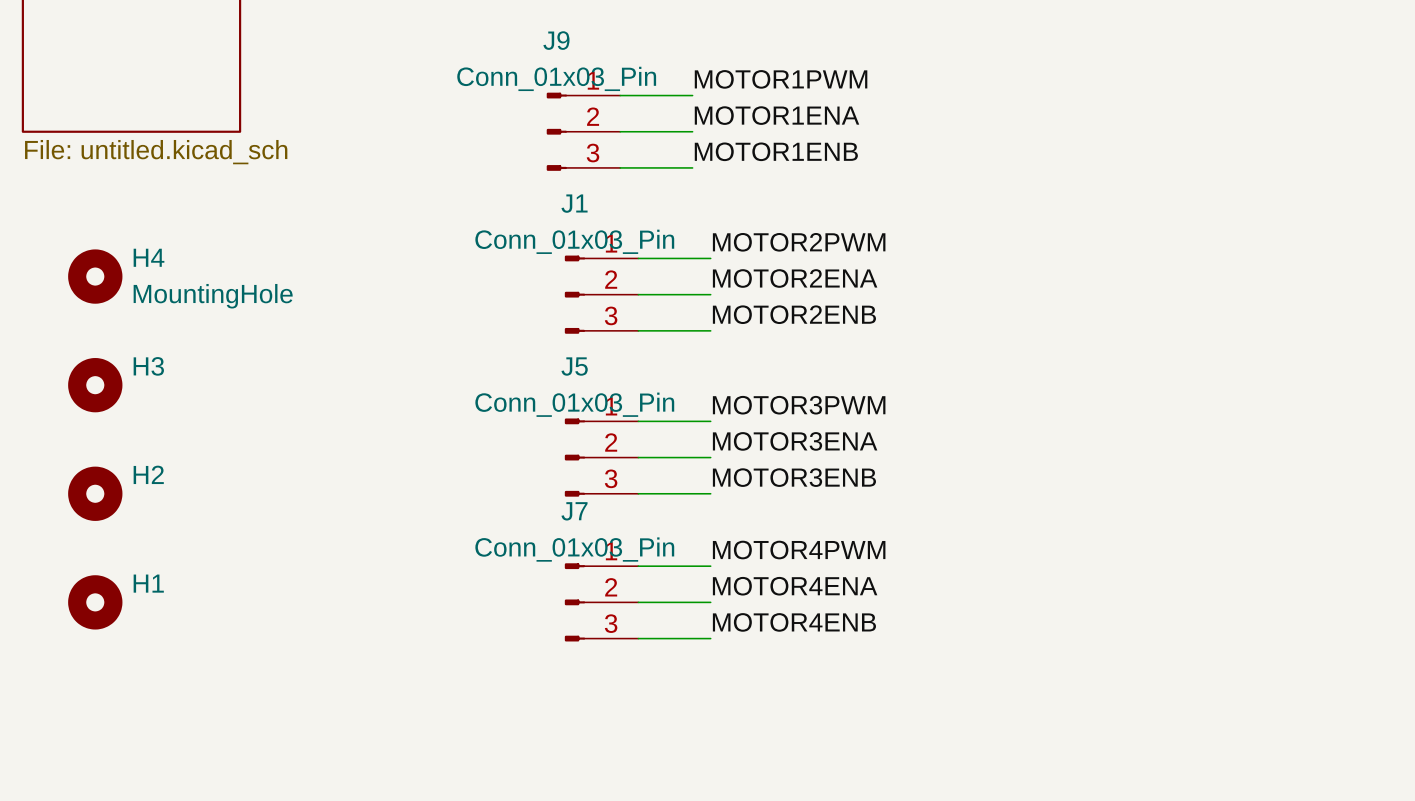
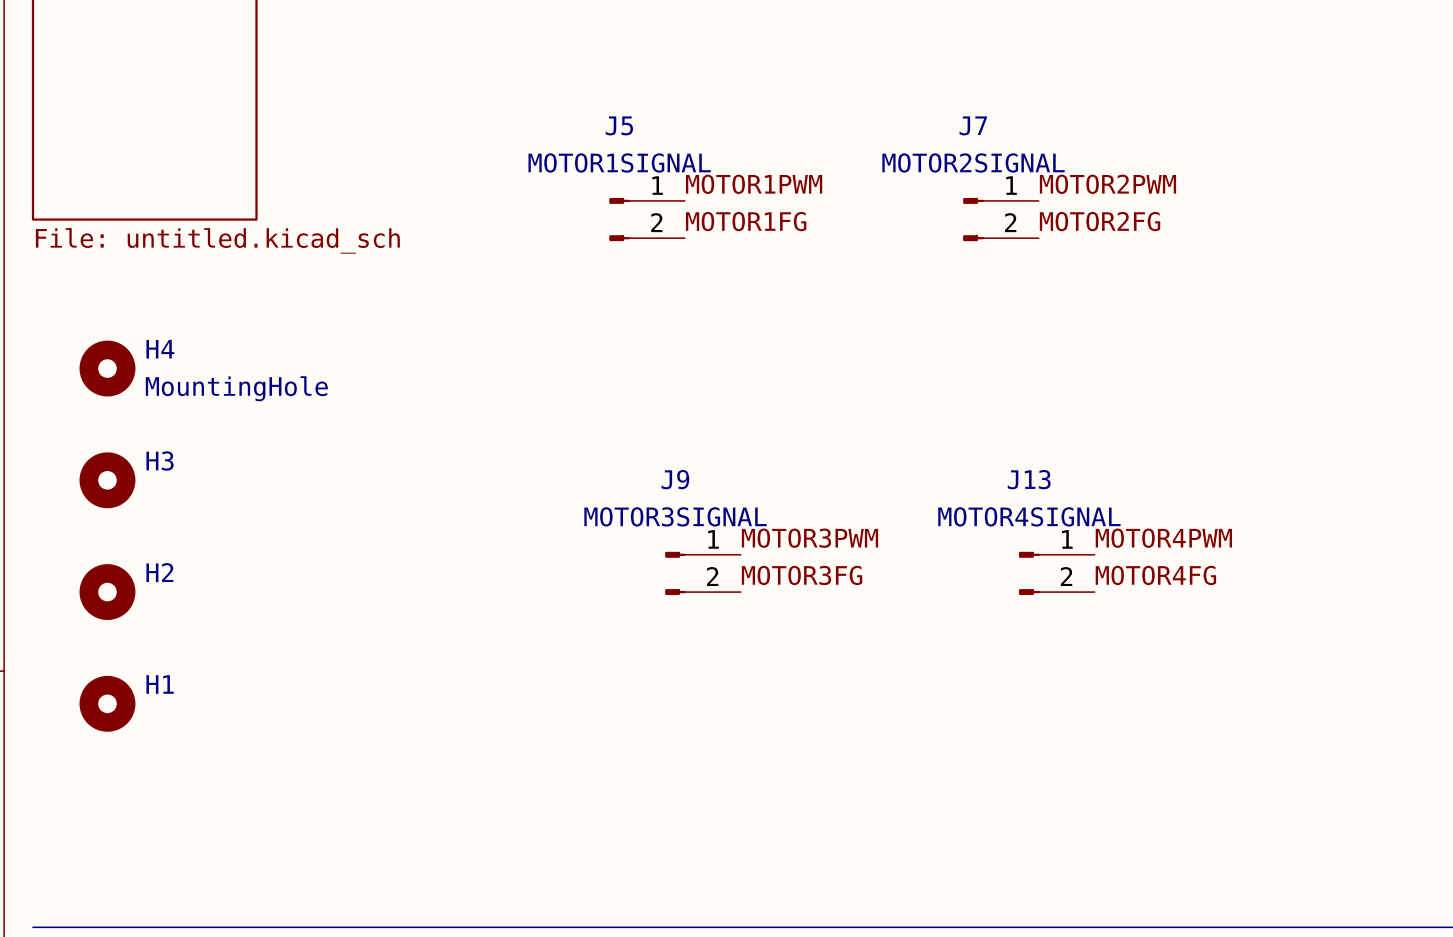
J9 value: Conn_01x03_Pin (556, 78) -> MOTOR3SIGNAL (675, 516)
label position: MOTOR1PWM (781, 79) -> MOTOR1PWM (754, 184)
J9 symbol: [546, 92, 621, 171] -> [665, 551, 741, 596]
wire: (620, 95) (692, 95) -> none
label: MOTOR1ENA (777, 115) -> none
wire: (620, 131) (692, 131) -> none
label: none -> MOTOR1FG (746, 221)
label: none -> MOTOR2FG (1100, 221)
label: MOTOR1ENB (776, 151) -> none
wire: (620, 167) (692, 167) -> none
label position: MOTOR2PWM (799, 242) -> MOTOR2PWM (1107, 184)
wire: (638, 258) (710, 258) -> none
label: MOTOR2ENA (795, 278) -> none
J1: Conn_01x03_Pin (601, 294) -> none
wire: (638, 294) (710, 294) -> none
label: MOTOR2ENB (794, 314) -> none
wire: (638, 330) (710, 330) -> none
J5 value: Conn_01x03_Pin (574, 404) -> MOTOR1SIGNAL (619, 162)
label: MOTOR3PWM (799, 405) -> none
J5 symbol: [564, 418, 639, 497] -> [609, 197, 685, 242]
wire: (638, 421) (710, 421) -> none
label: MOTOR3ENA (795, 441) -> MOTOR3PWM (809, 538)
label: none -> MOTOR4PWM (1163, 538)
J13: none -> MOTOR4SIGNAL (1056, 573)
label: MOTOR3ENB (794, 477) -> MOTOR3FG (802, 575)
label: none -> MOTOR4FG (1155, 575)
J7 value: Conn_01x03_Pin (574, 549) -> MOTOR2SIGNAL (973, 162)
label: MOTOR4PWM (799, 550) -> none
J7 symbol: [564, 563, 639, 642] -> [963, 197, 1039, 242]
wire: (638, 566) (710, 566) -> none
label: MOTOR4ENA (795, 586) -> none
wire: (638, 602) (710, 602) -> none
label: MOTOR4ENB (794, 622) -> none
wire: (638, 638) (710, 638) -> none

